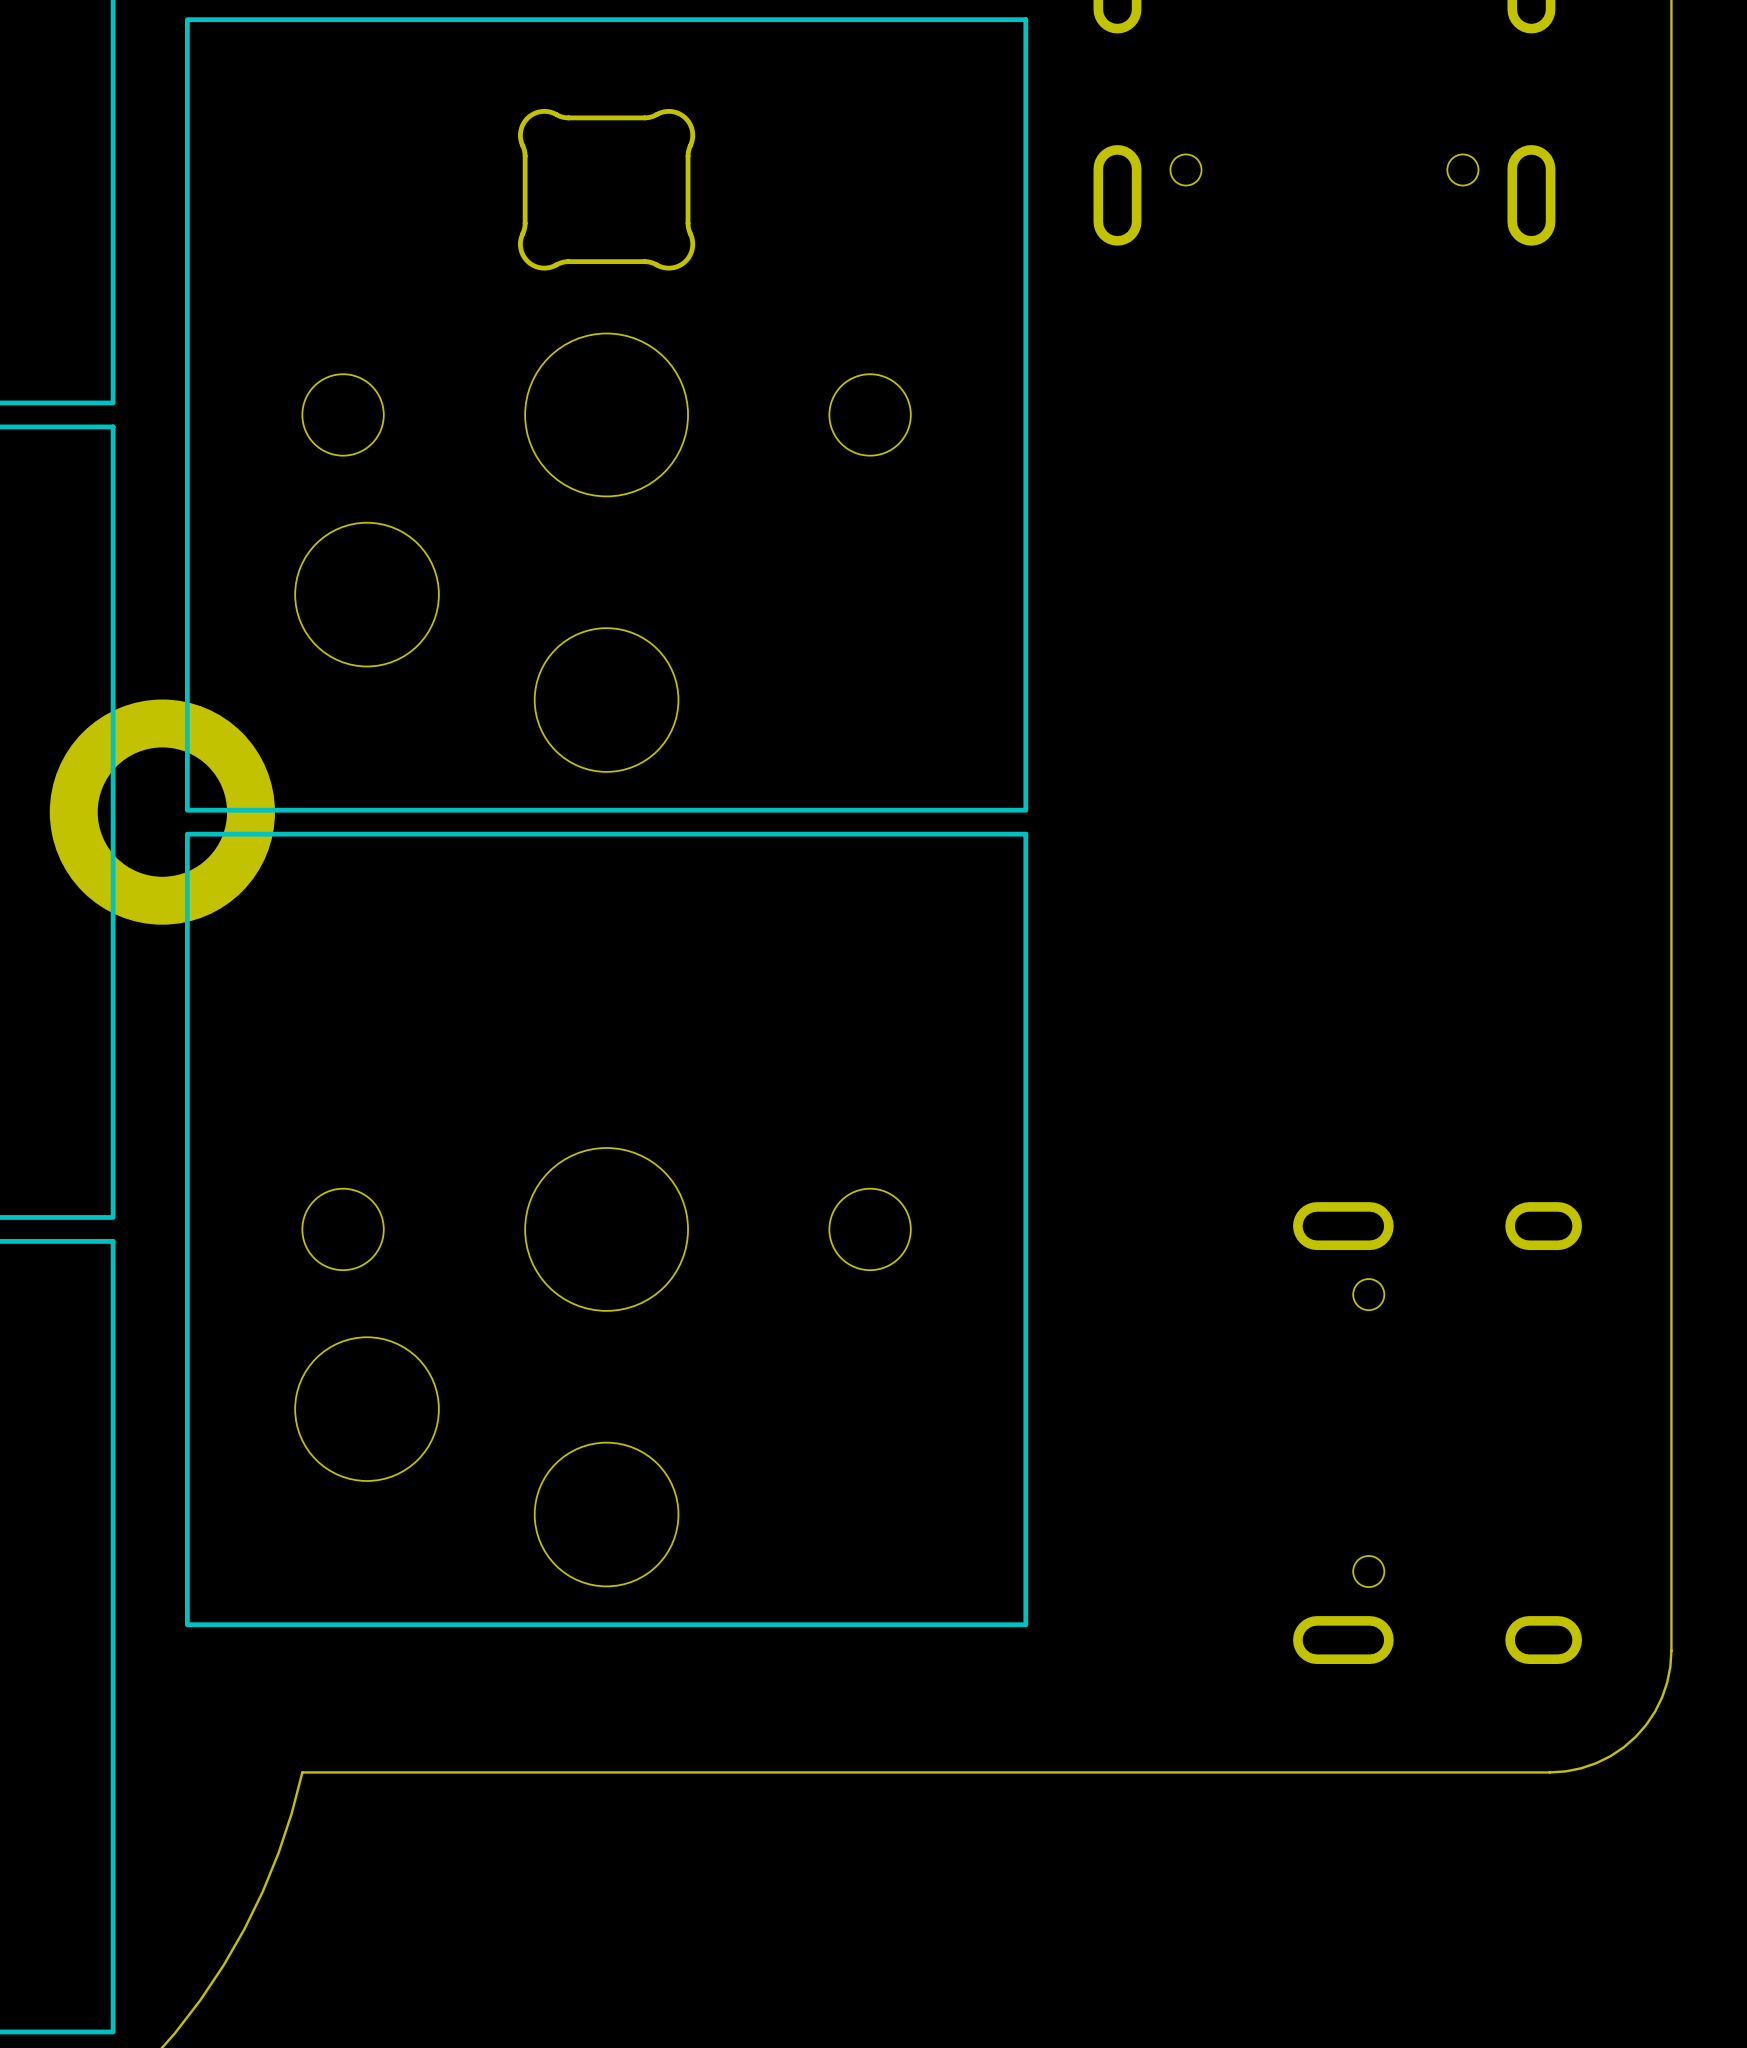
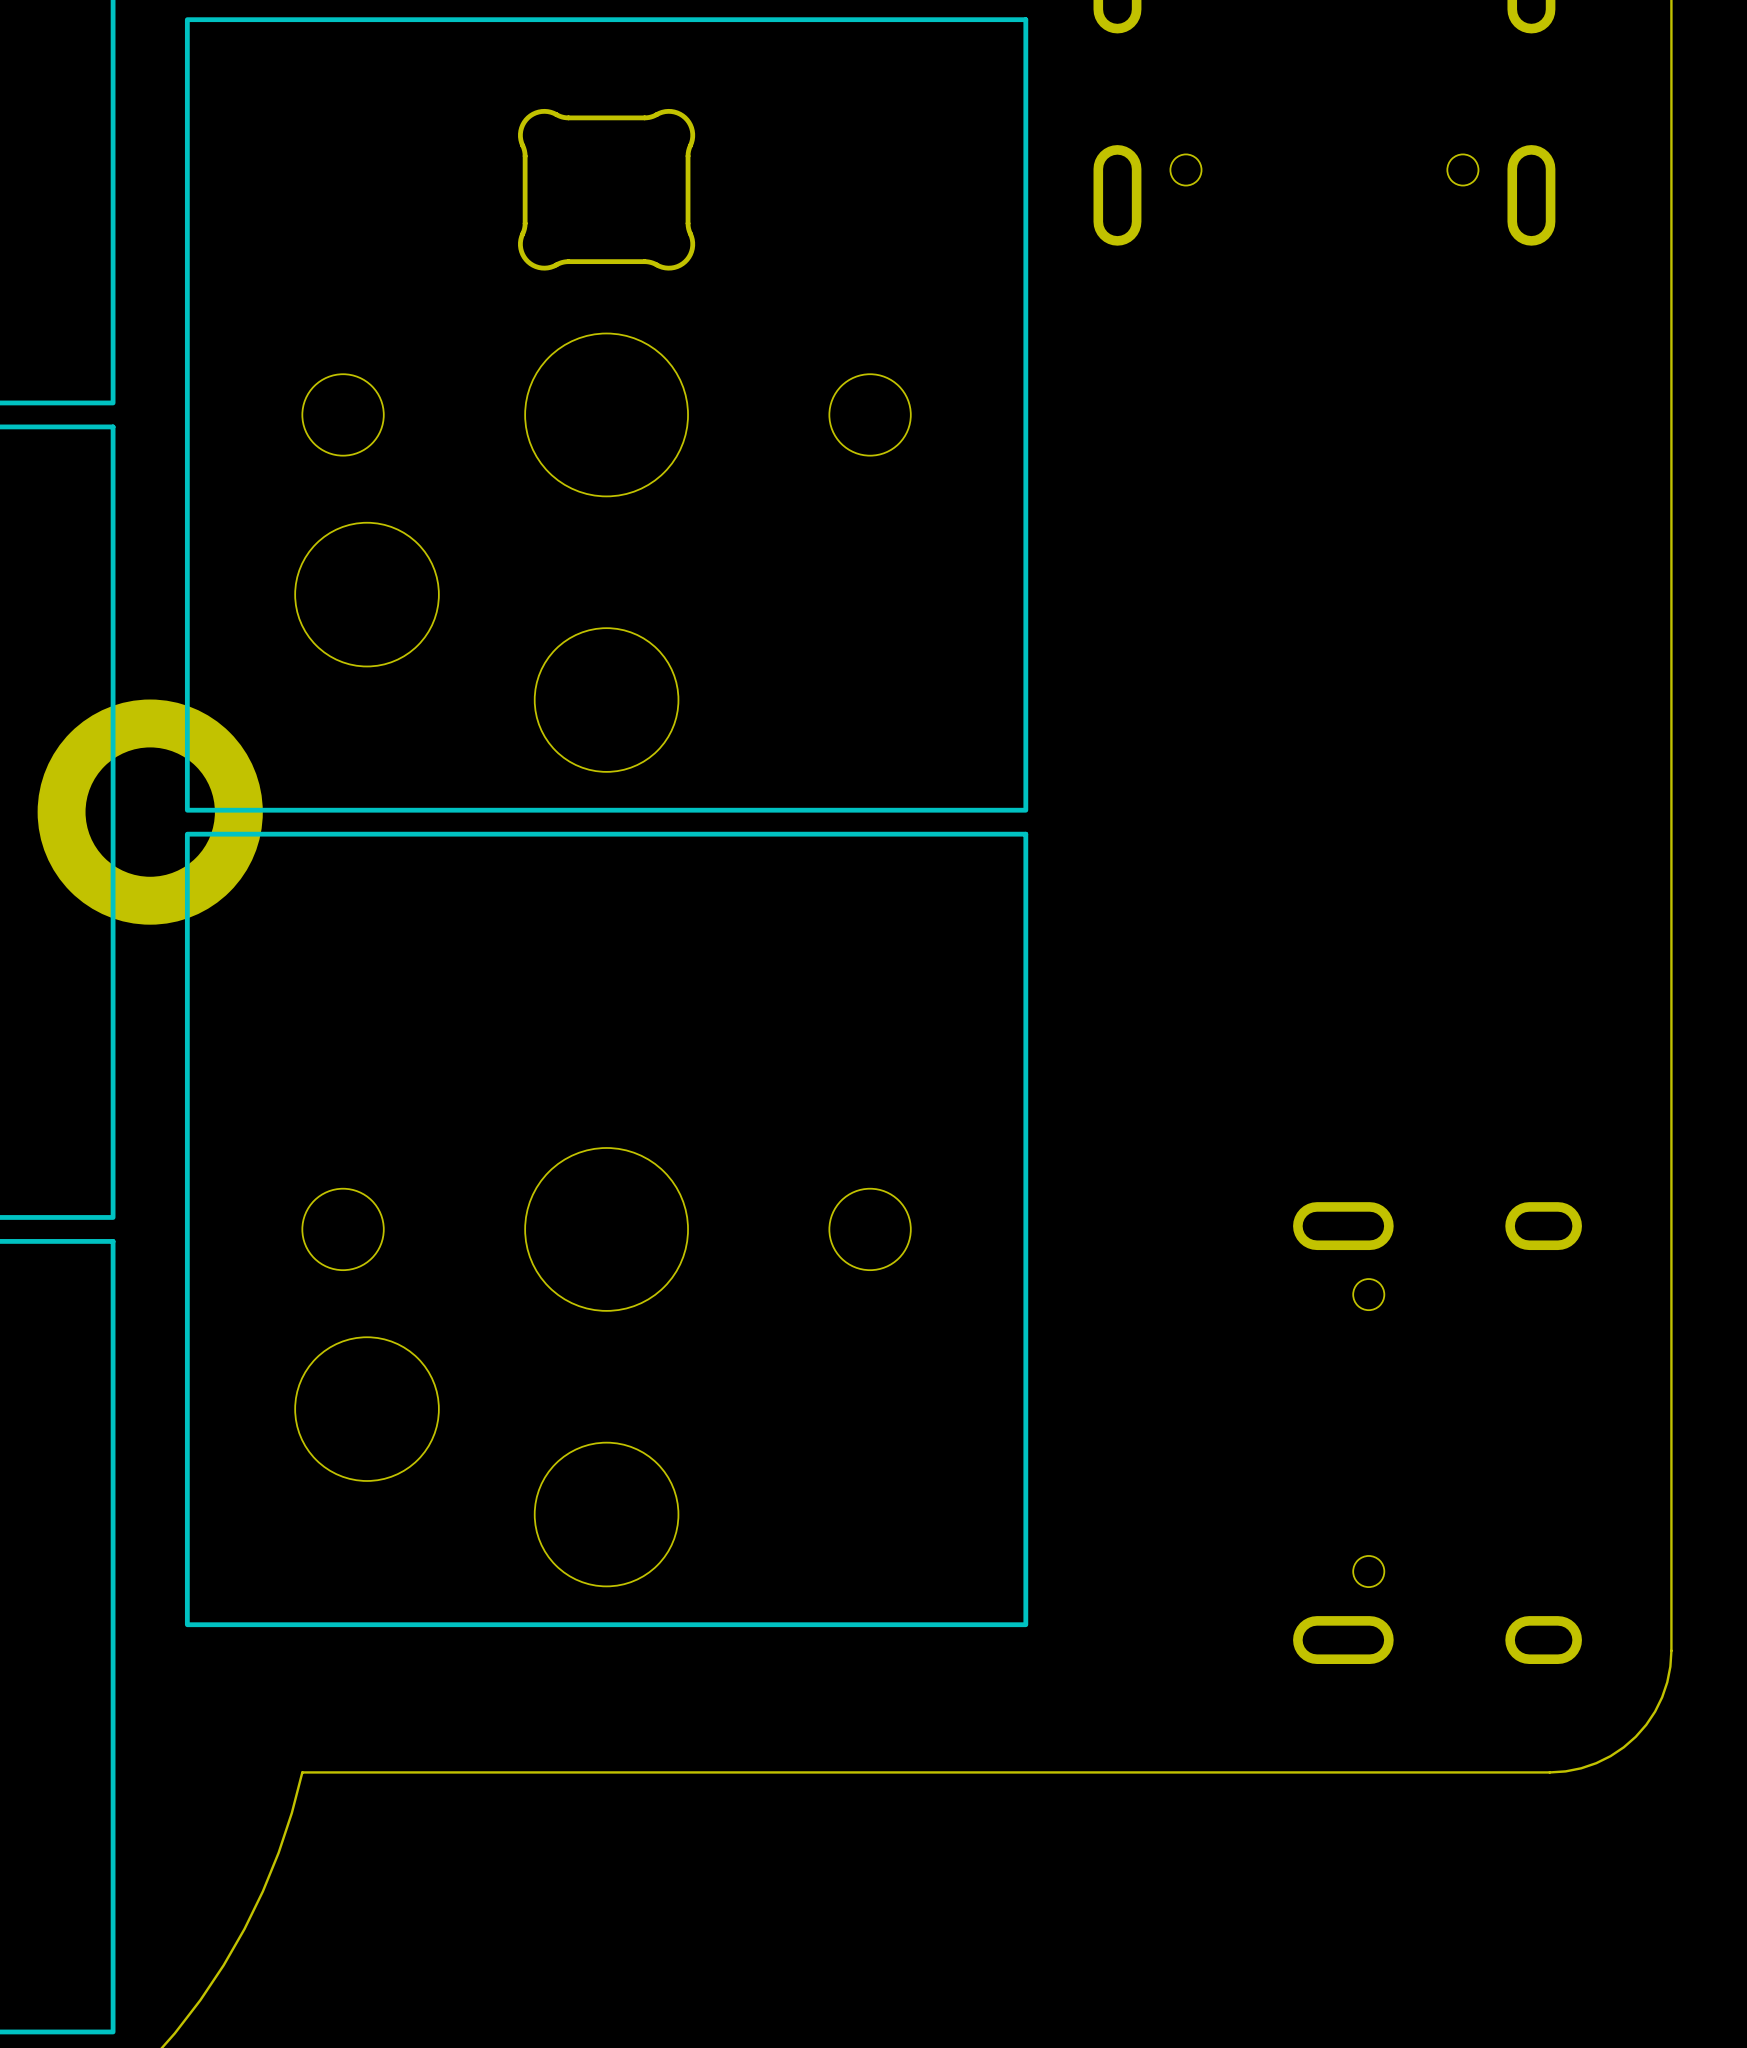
part position: (162, 812) -> (150, 812)

